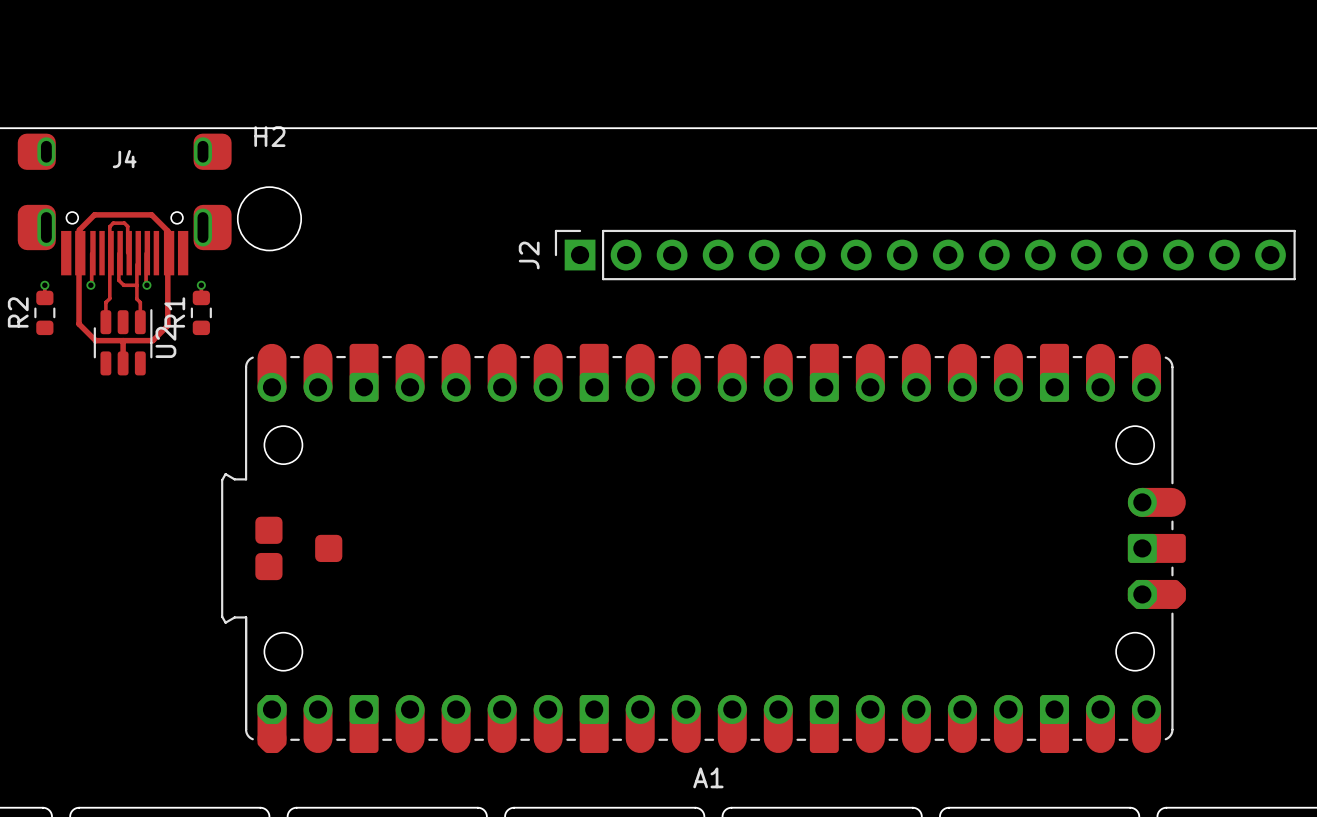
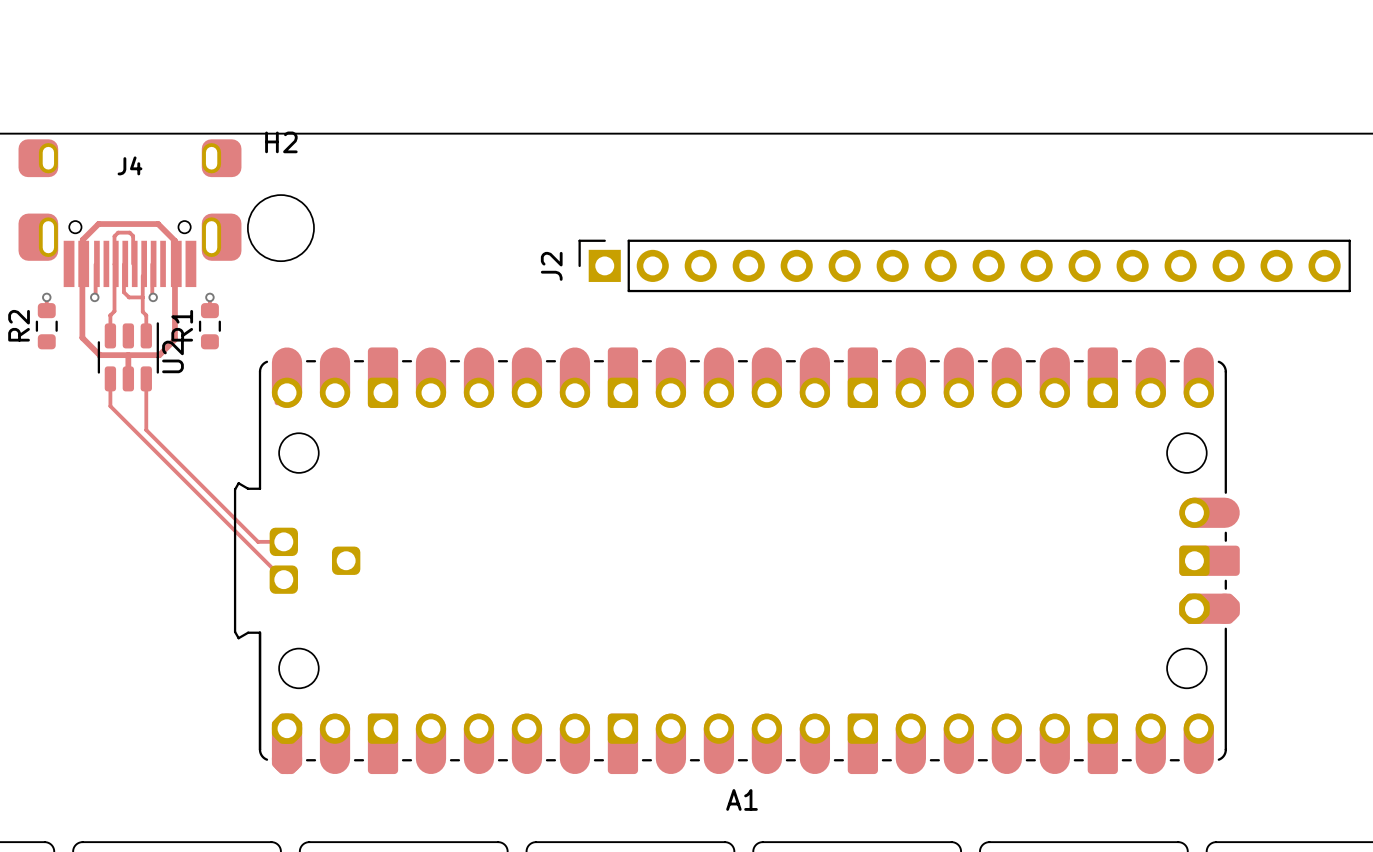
A1 footprint: [221, 343, 1186, 754] -> [233, 347, 1240, 775]
track: none -> (110, 378) (110, 406) (283, 579)
track: none -> (146, 378) (146, 430) (258, 541) (283, 541)

